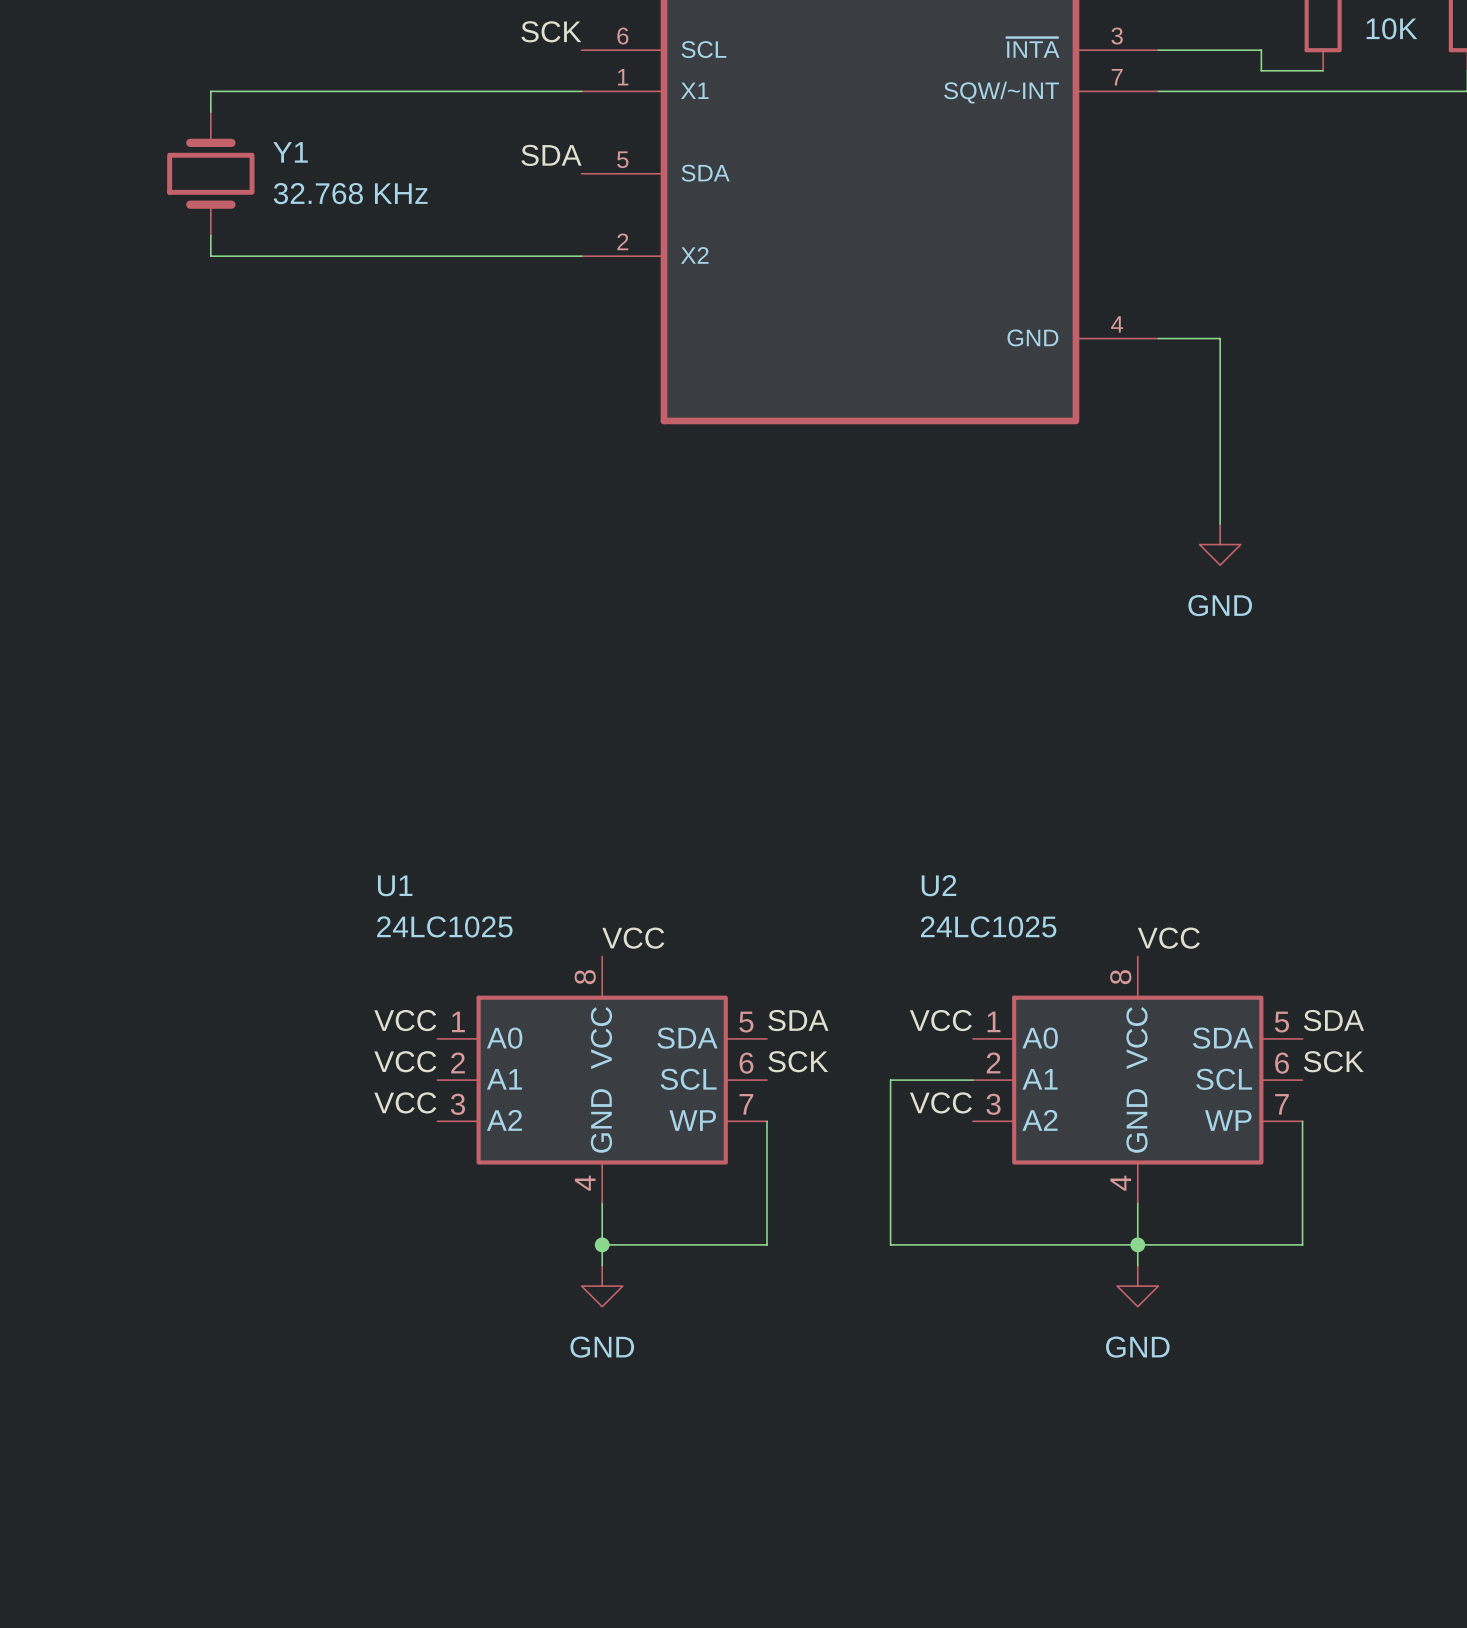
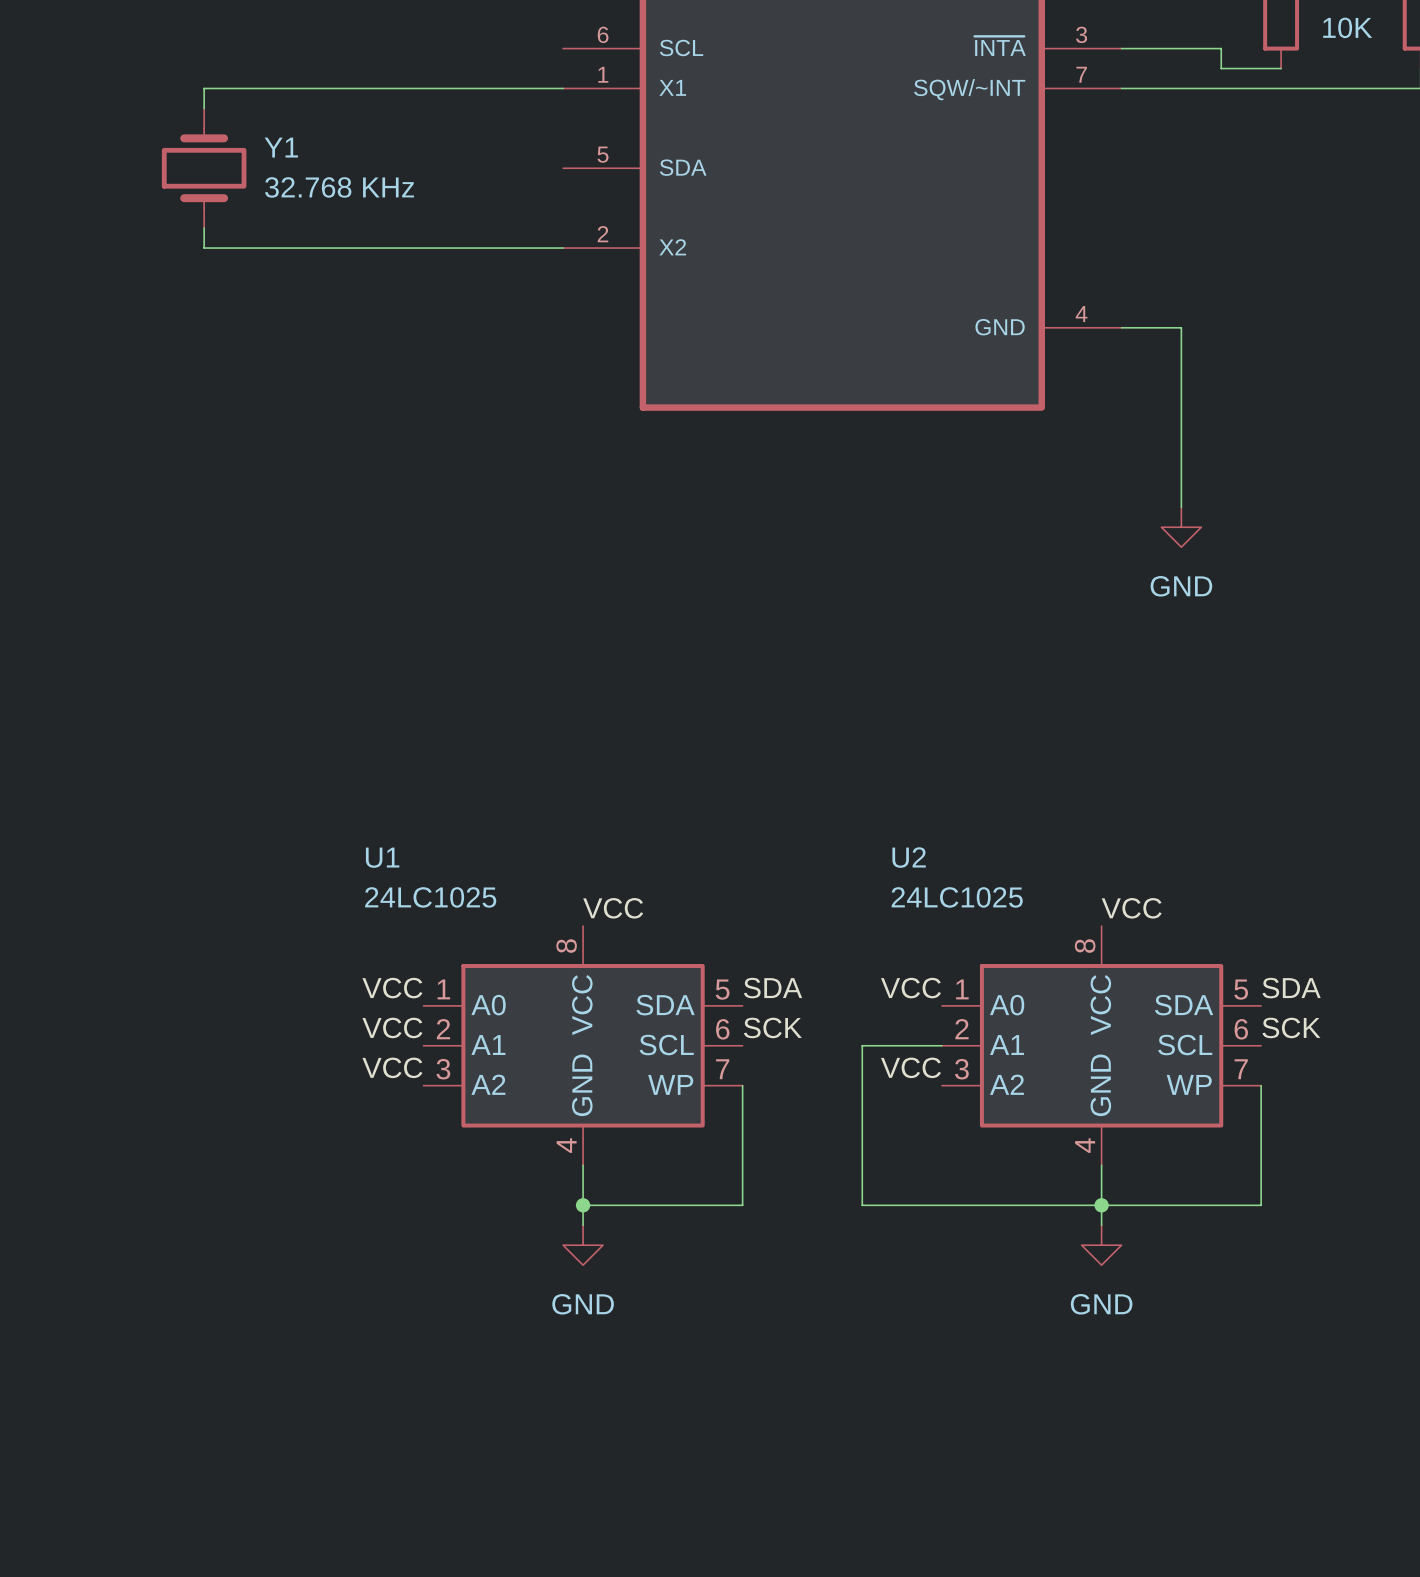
label: SCK (551, 31) -> none
label: SDA (551, 155) -> none

